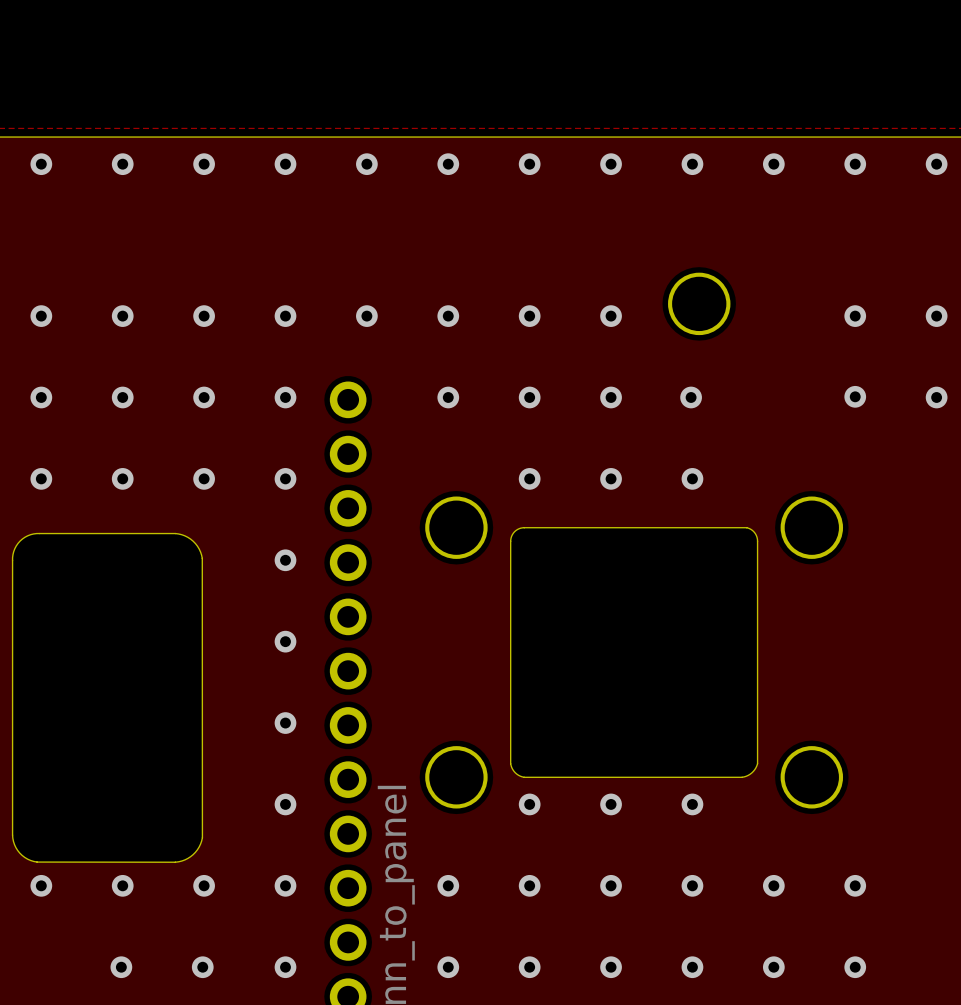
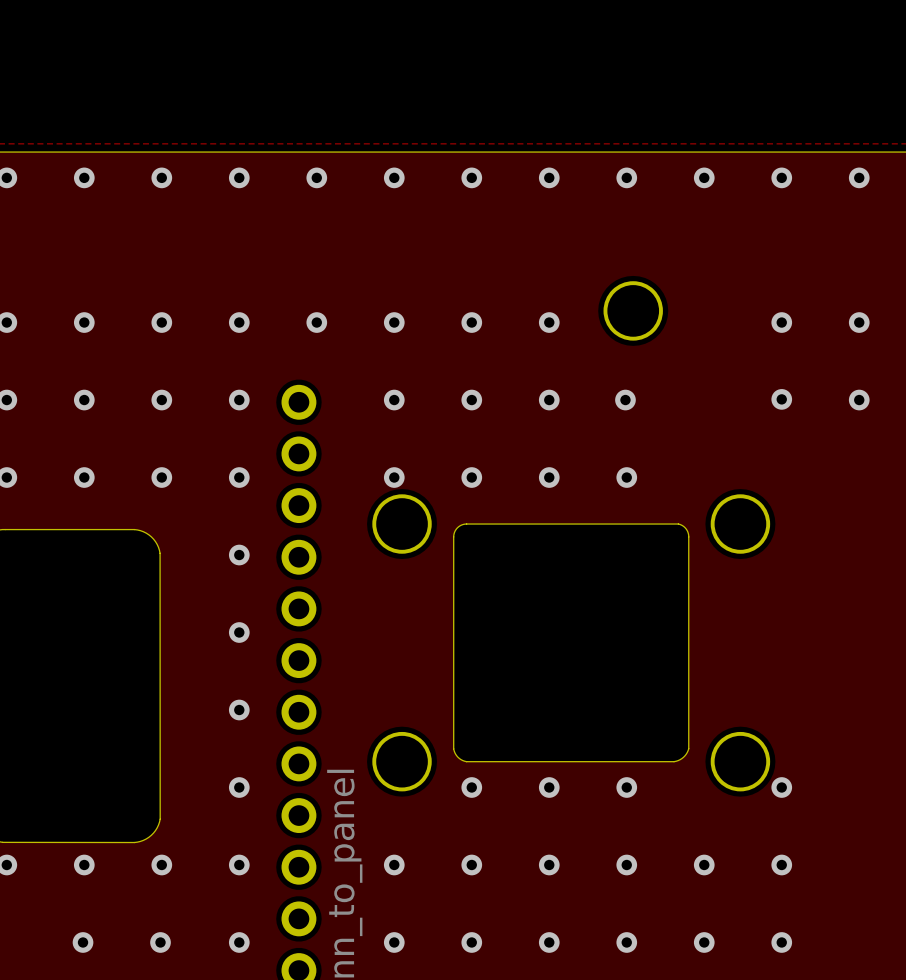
via: none -> (394, 477)
via: none -> (781, 787)

